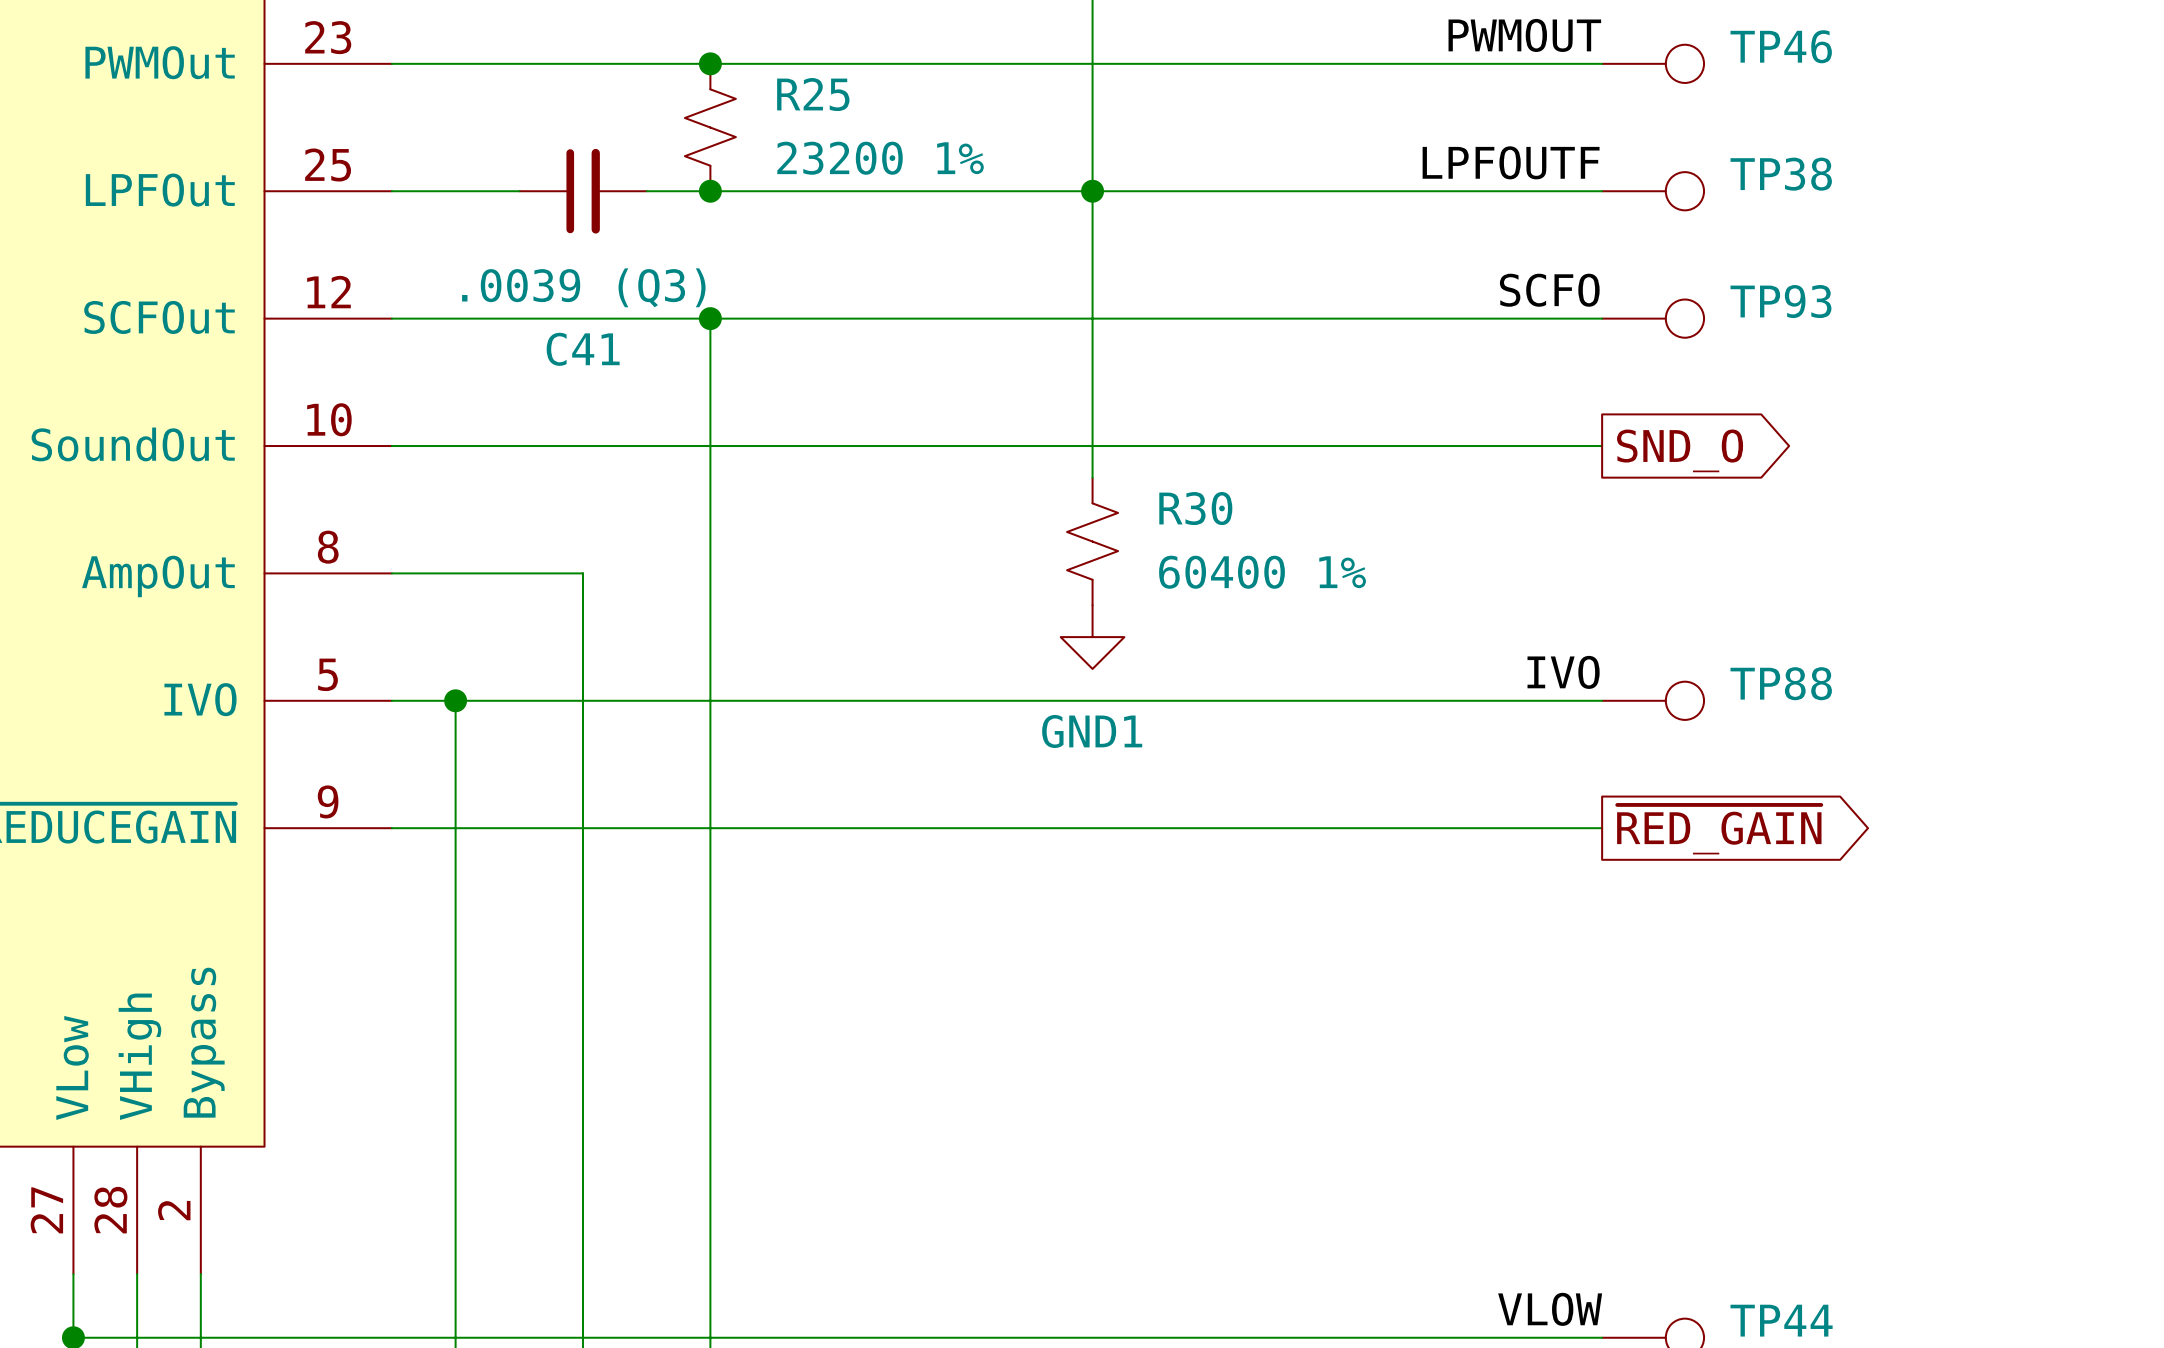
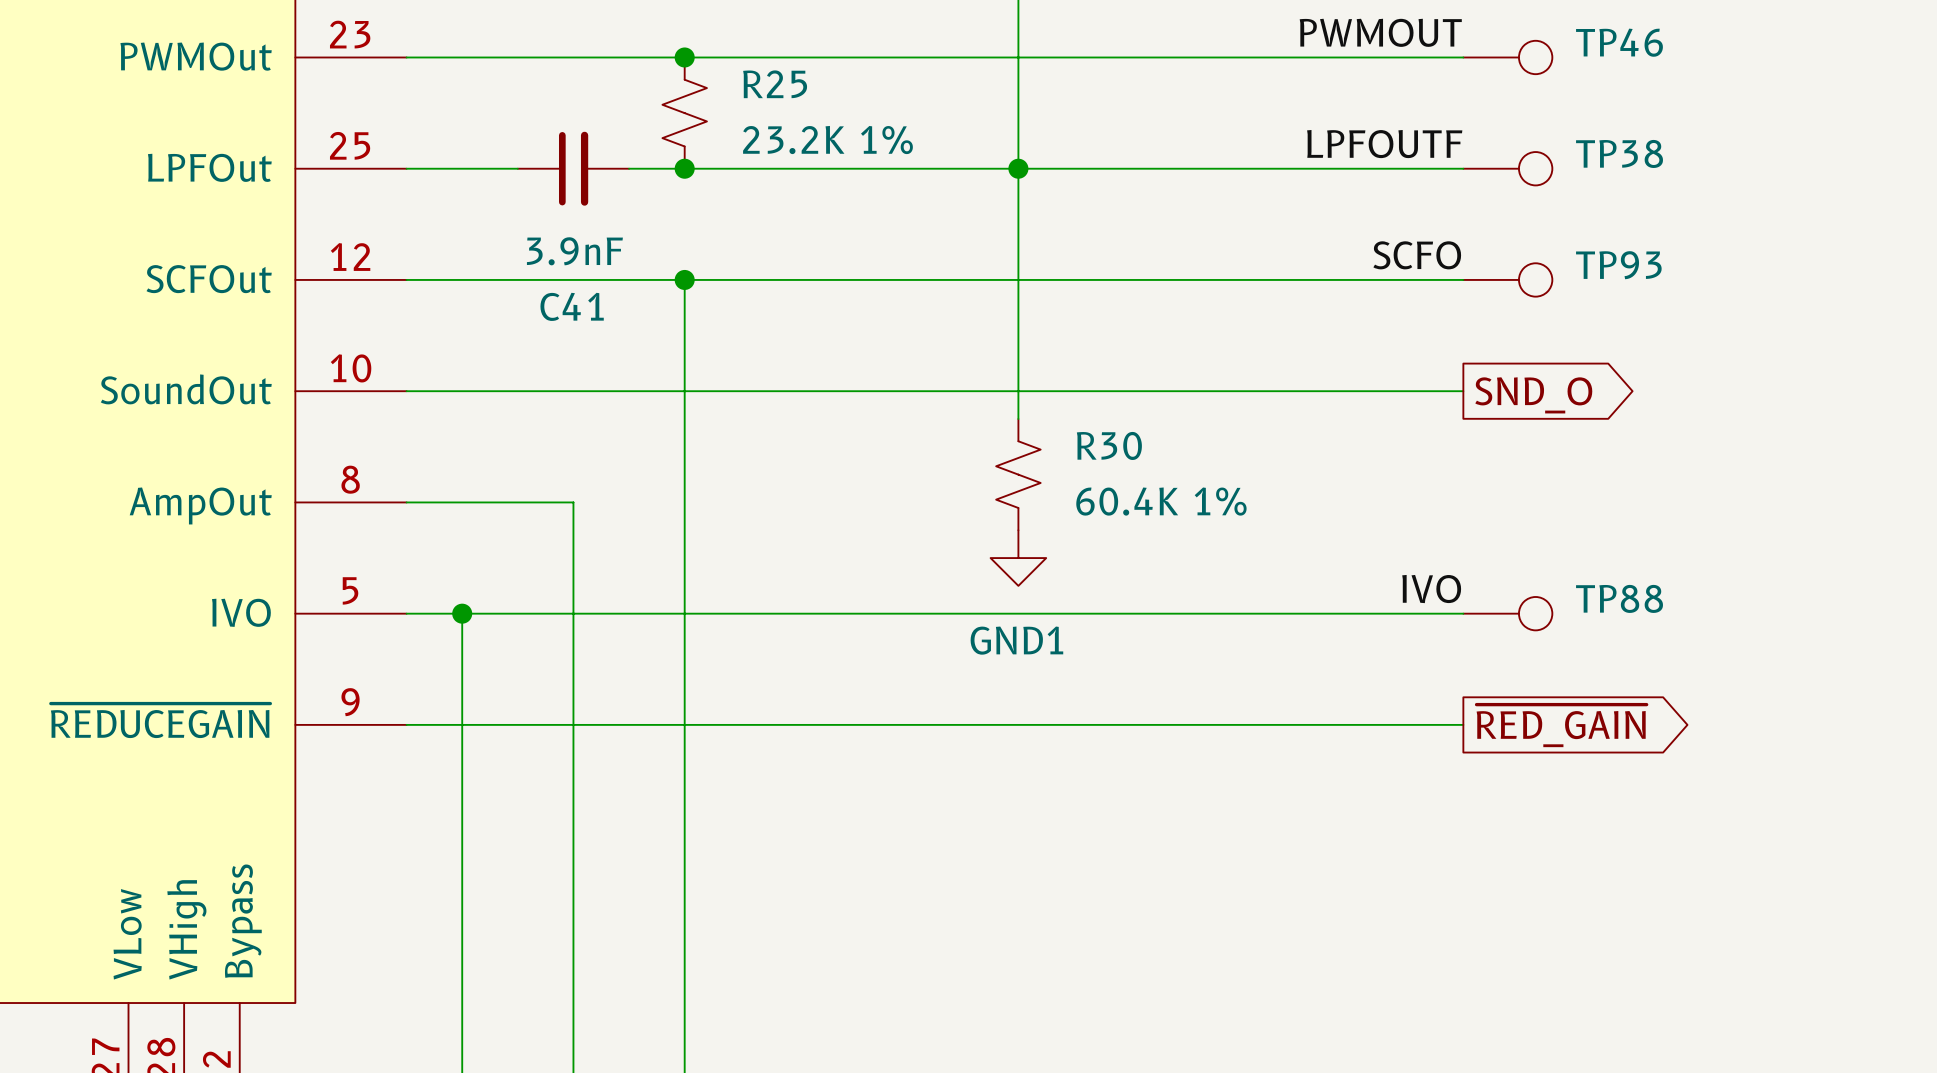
R25 value: 23200 1% (880, 158) -> 23.2K 1% (827, 140)
C41 value: .0039 (Q3) (583, 287) -> 3.9nF (574, 251)
R30 value: 60400 1% (1262, 572) -> 60.4K 1% (1161, 501)

